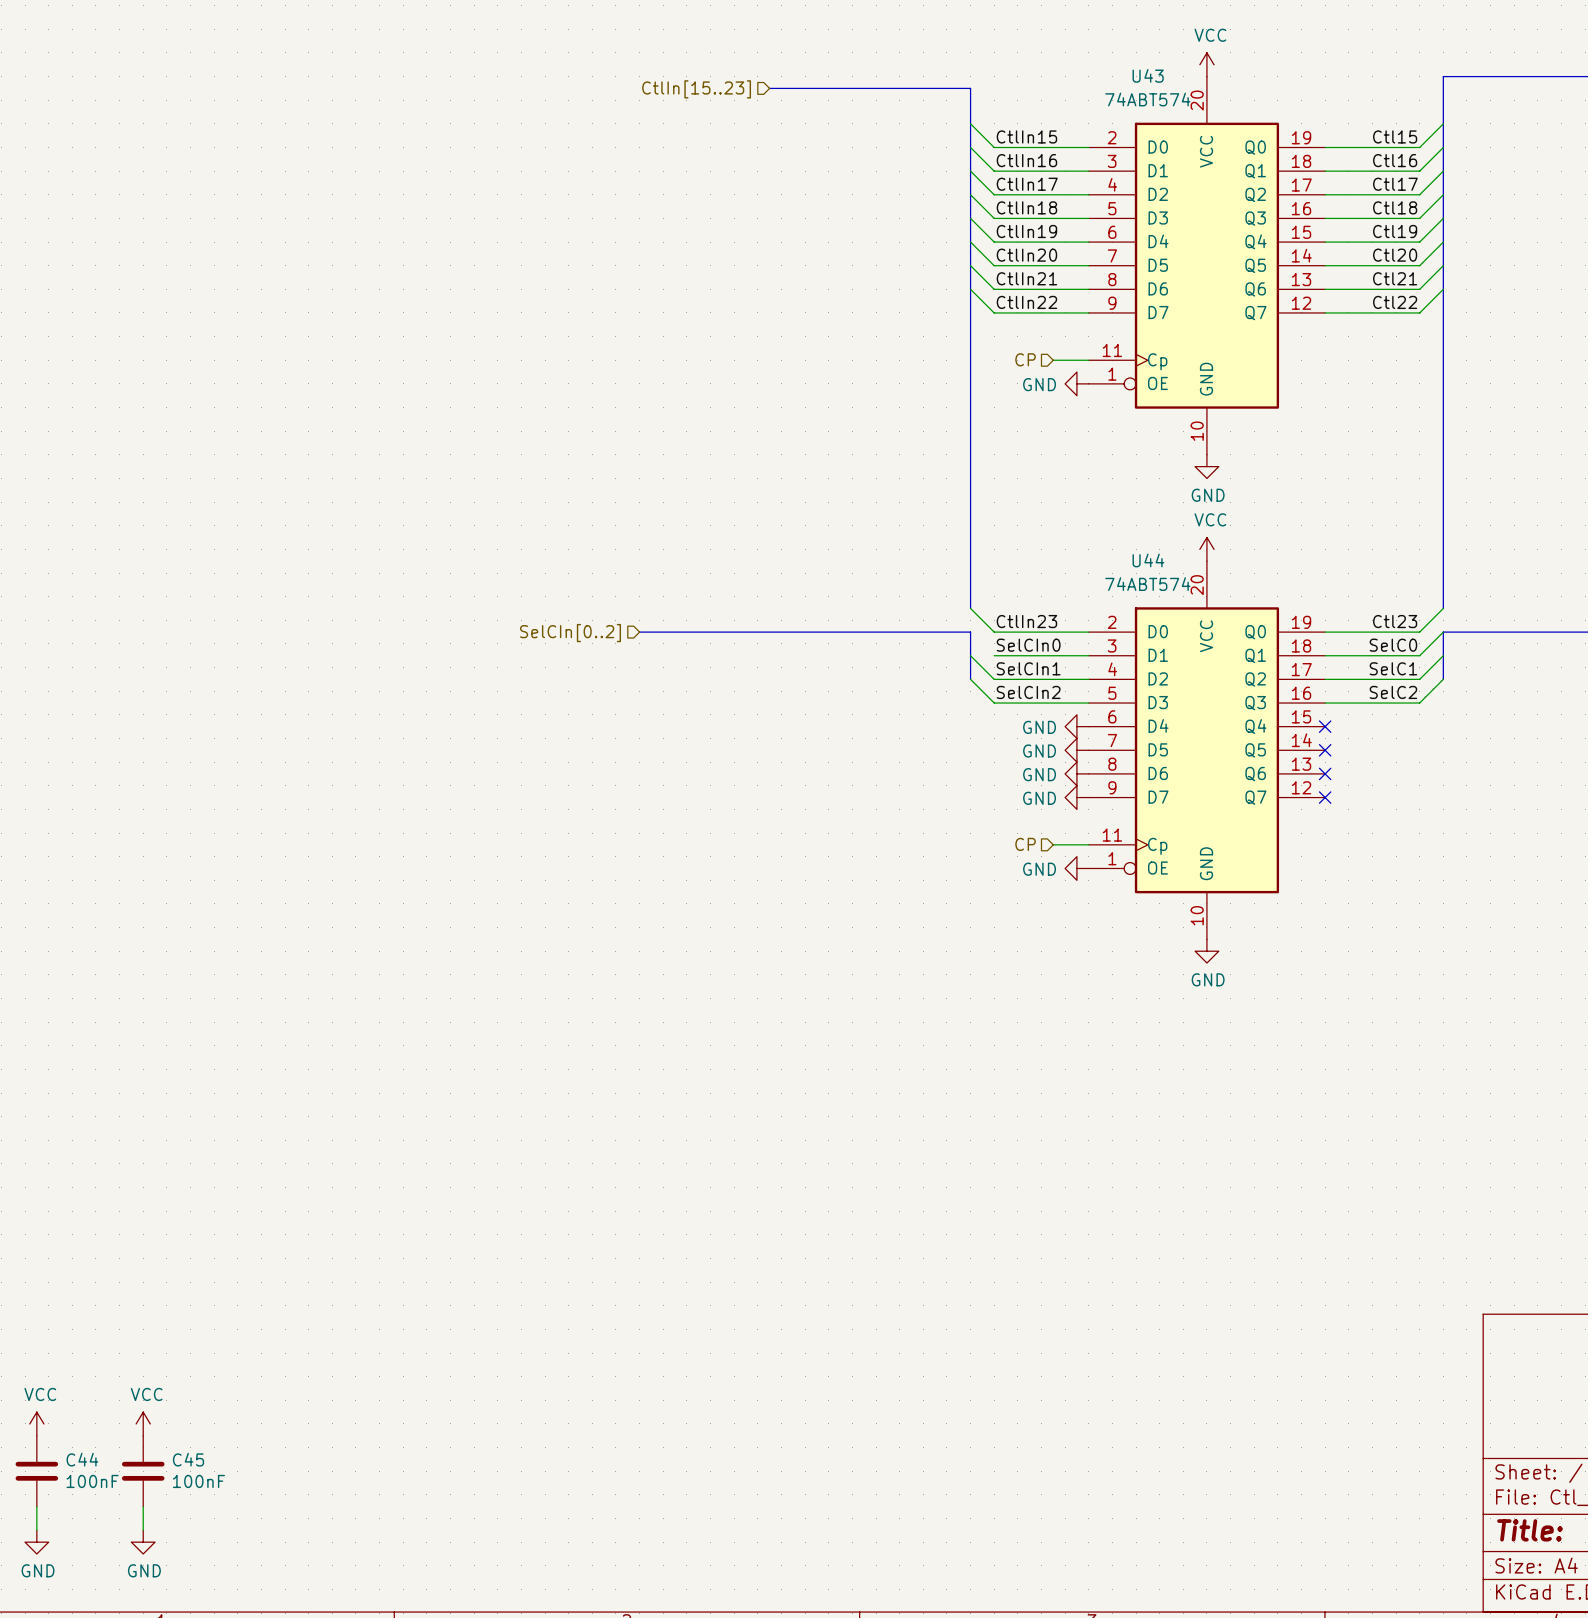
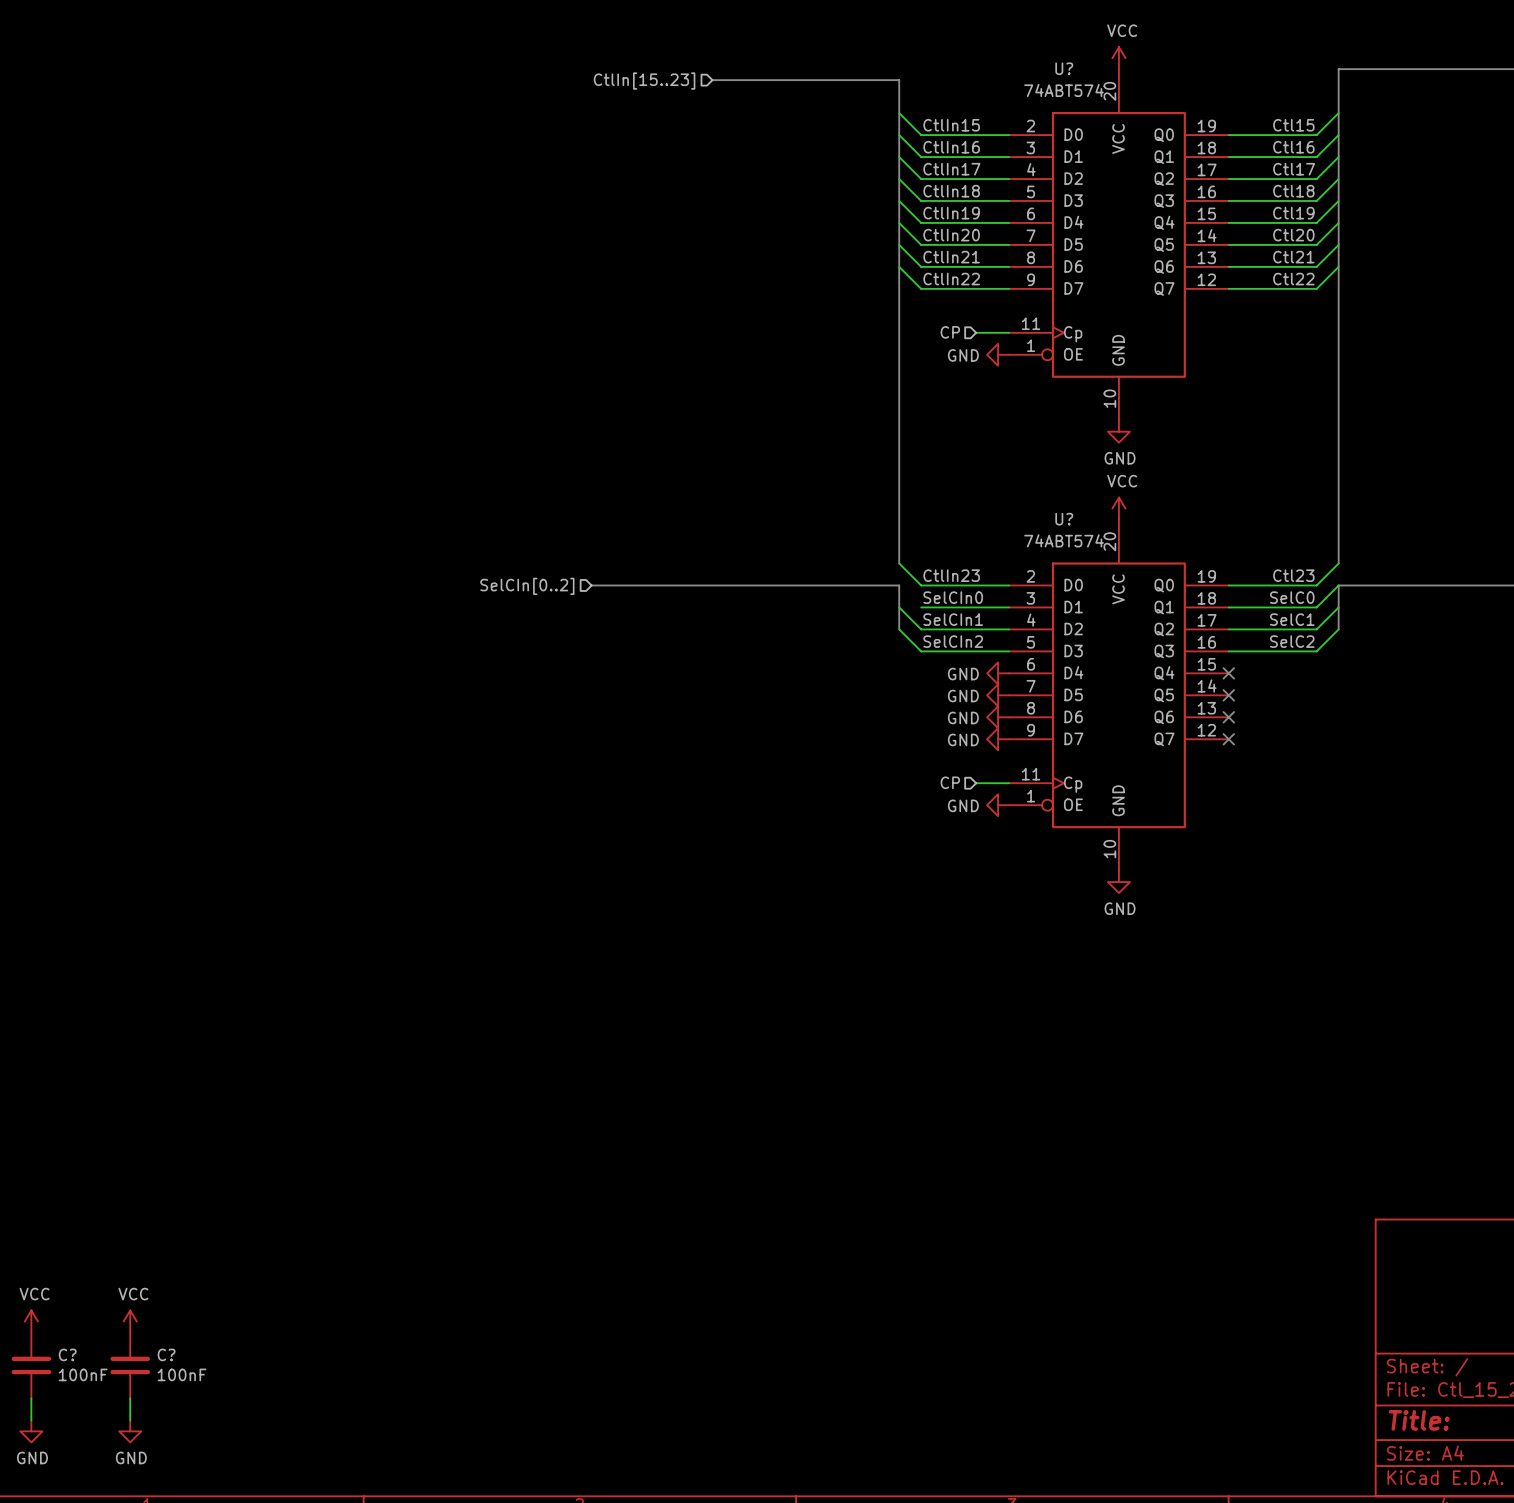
U43 name: U43 (1148, 75) -> U? (1064, 68)
U44 name: U44 (1148, 560) -> U? (1064, 519)
C44 name: C44 (82, 1459) -> C? (67, 1354)
C45 name: C45 (188, 1459) -> C? (166, 1354)

